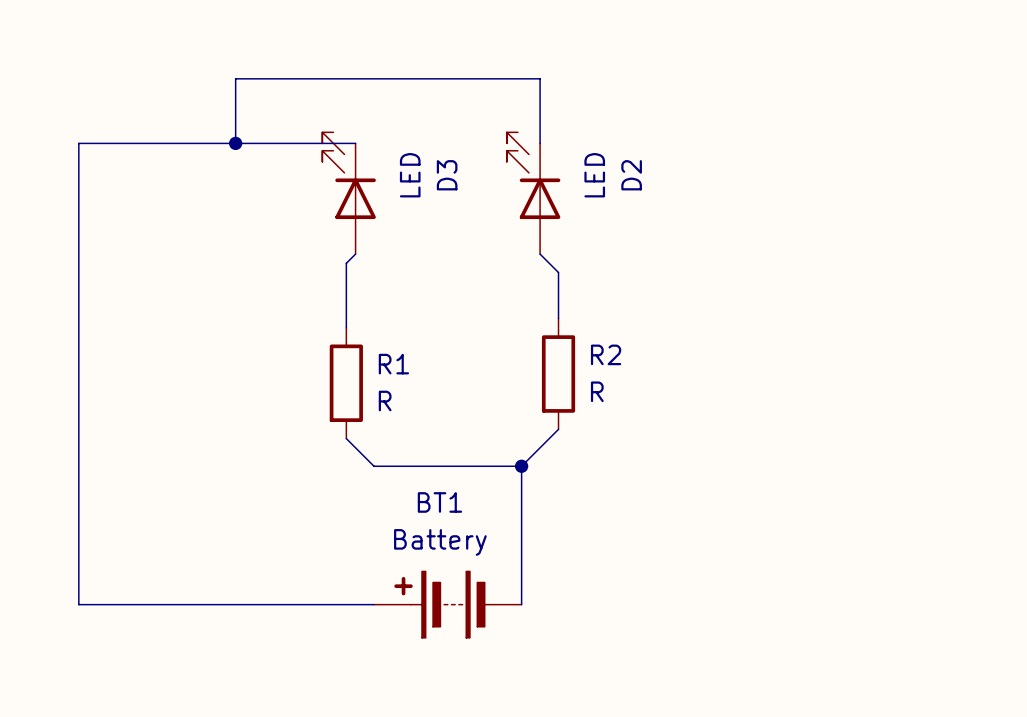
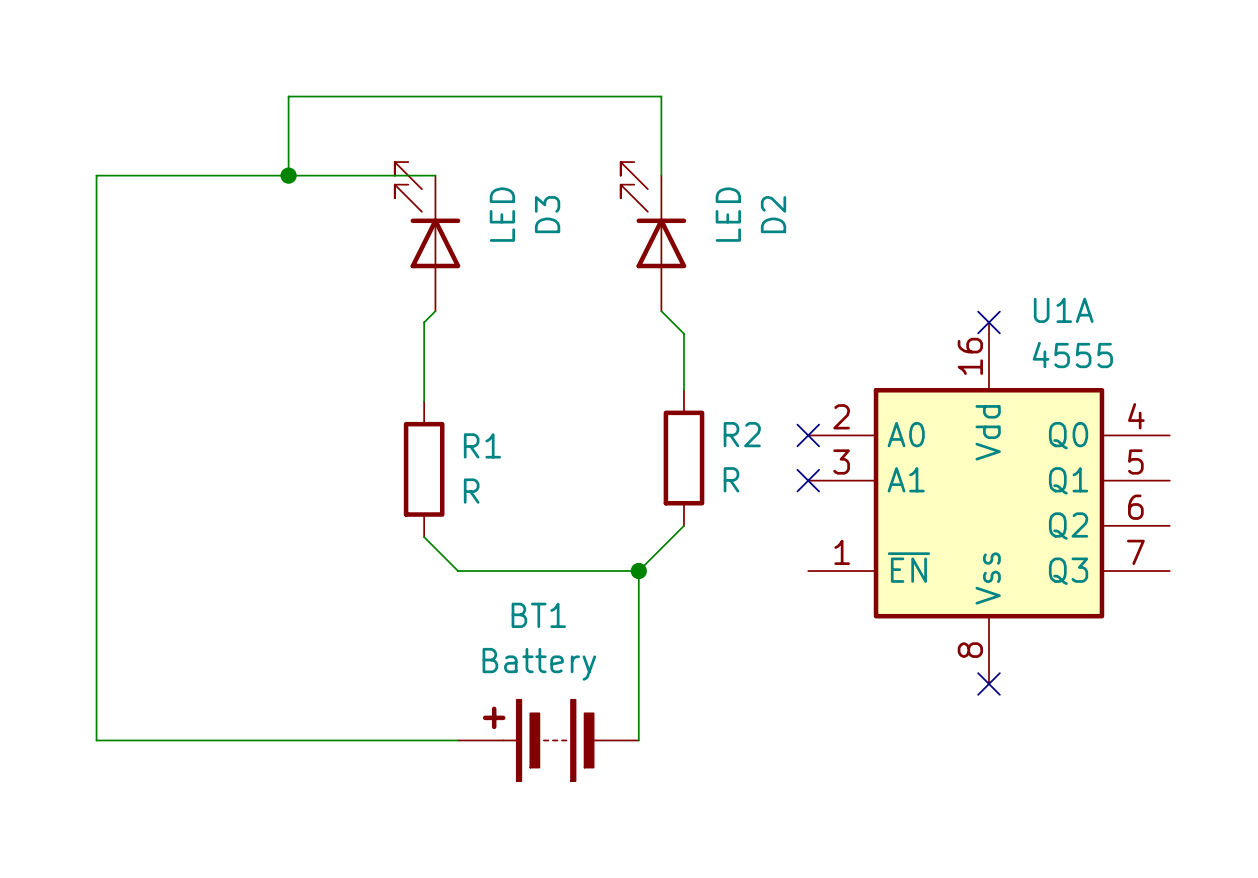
no-connect mark: none -> (989, 322)
no-connect mark: none -> (808, 435)
no-connect mark: none -> (808, 480)
U1A: none -> 4555 (989, 503)
no-connect mark: none -> (989, 683)

